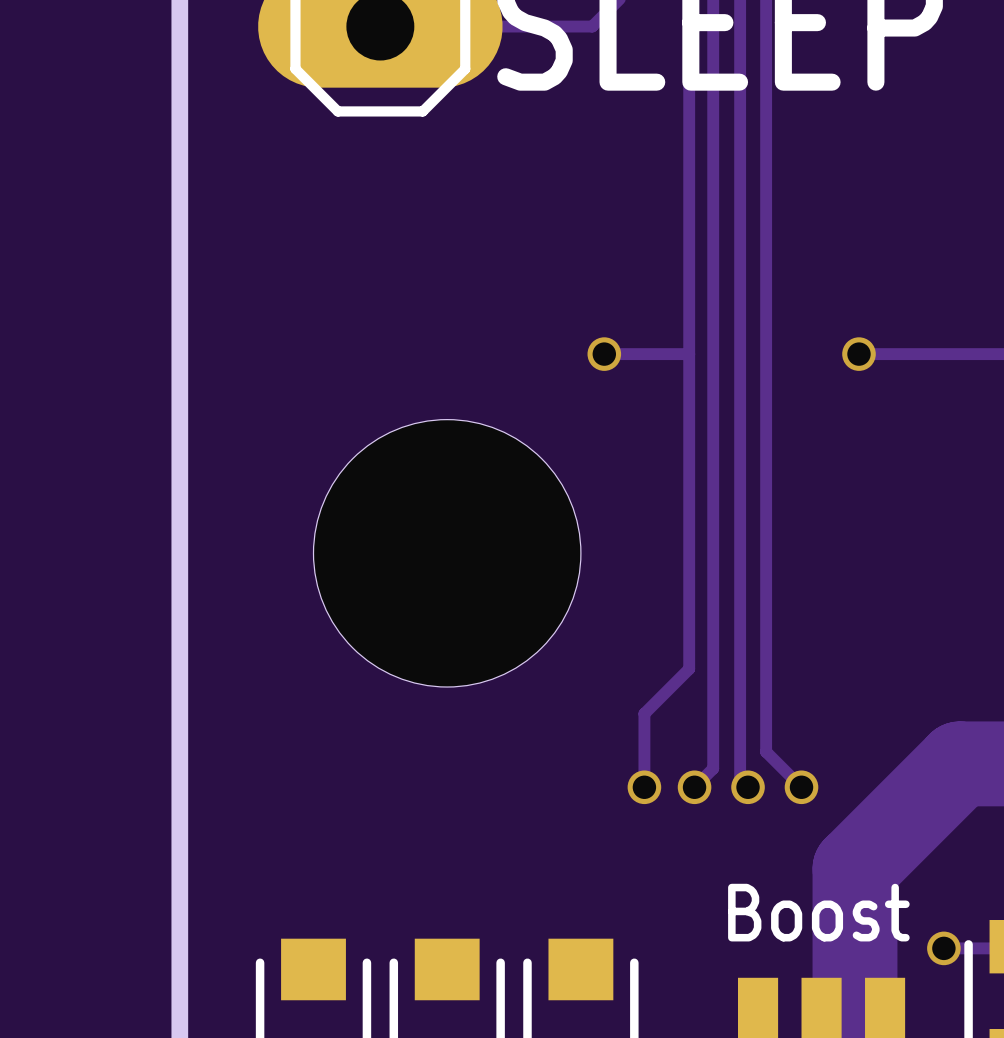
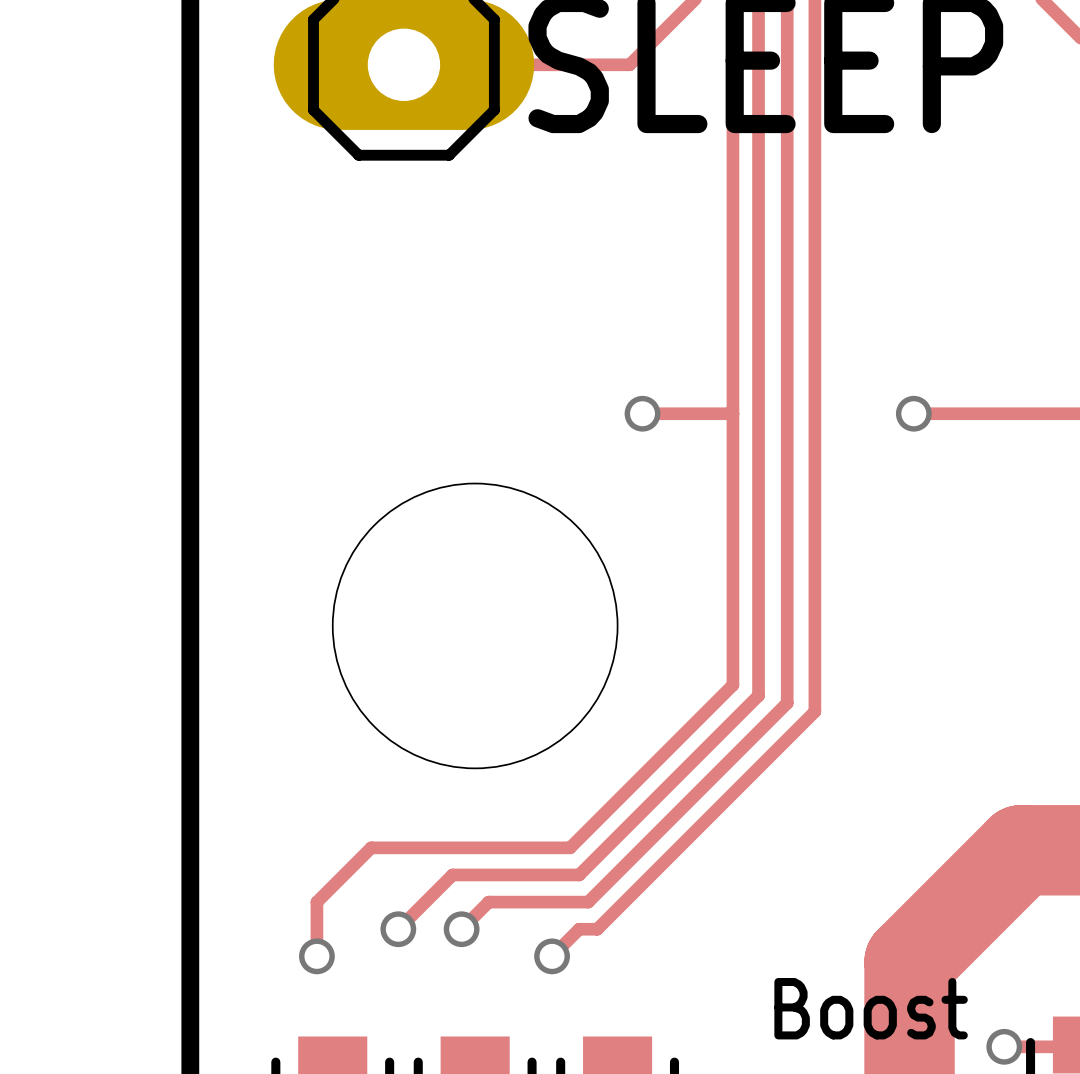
track: (689, 608) (689, 668) (644, 713) (644, 787) -> (732, 685) (570, 847) (371, 847) (316, 902) (316, 956)
track: (713, 618) (713, 768) (694, 787) -> (758, 695) (579, 874) (452, 874) (398, 929)
track: (740, 625) (740, 779) (748, 787) -> (787, 703) (588, 902) (488, 902) (461, 929)
track: (766, 633) (766, 751) (801, 787) -> (814, 711) (597, 929) (579, 929) (552, 956)
via: (644, 787) -> none
via: (694, 787) -> none
via: (748, 787) -> none
via: (801, 787) -> none
via: none -> (398, 929)
via: none -> (461, 929)
via: none -> (316, 956)
via: none -> (552, 956)

